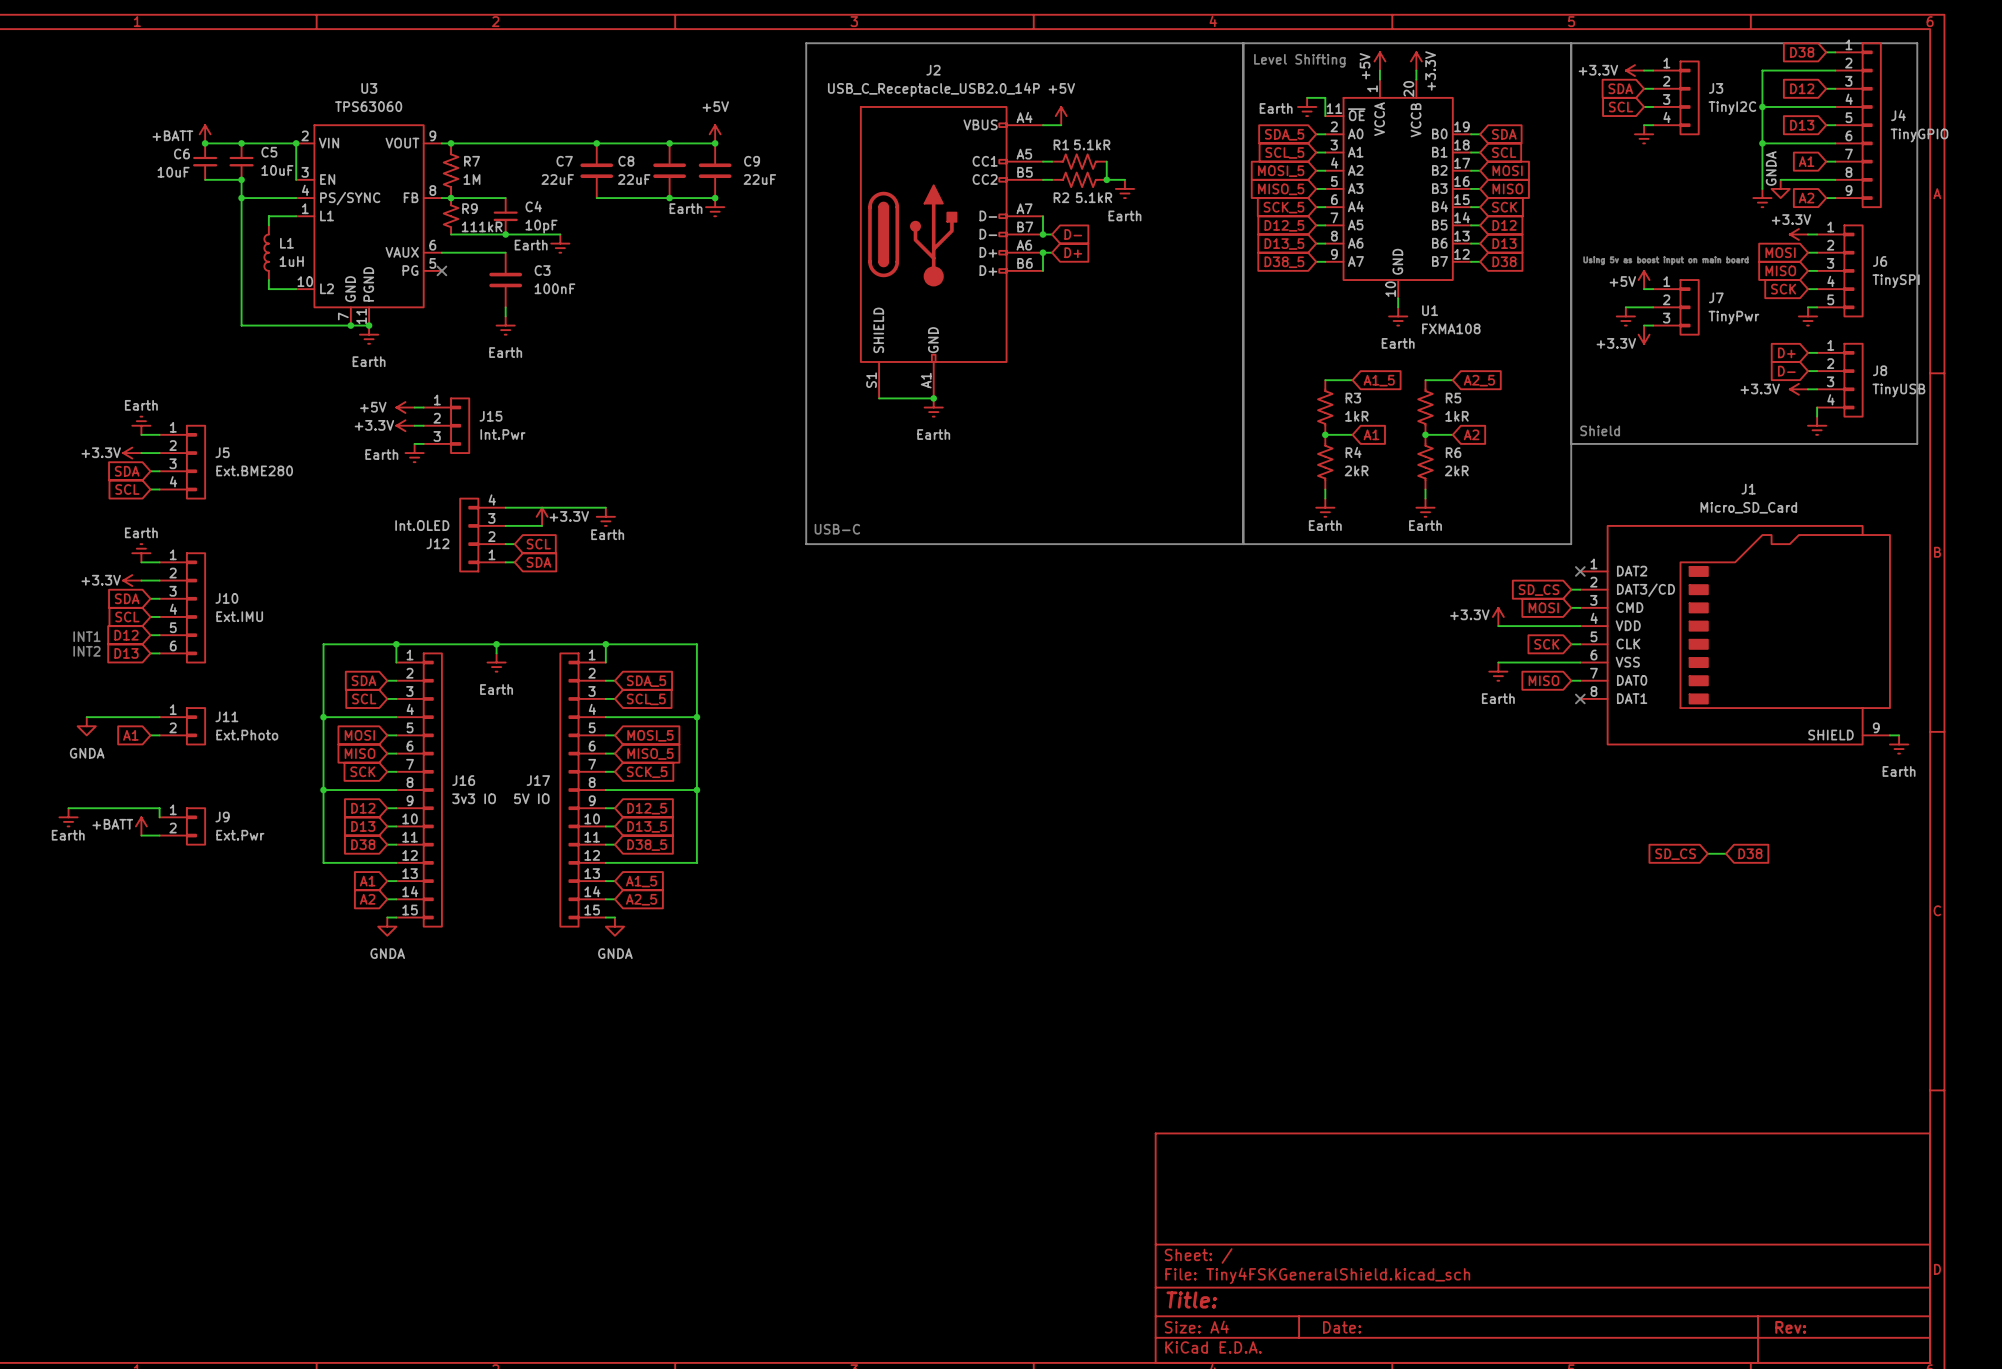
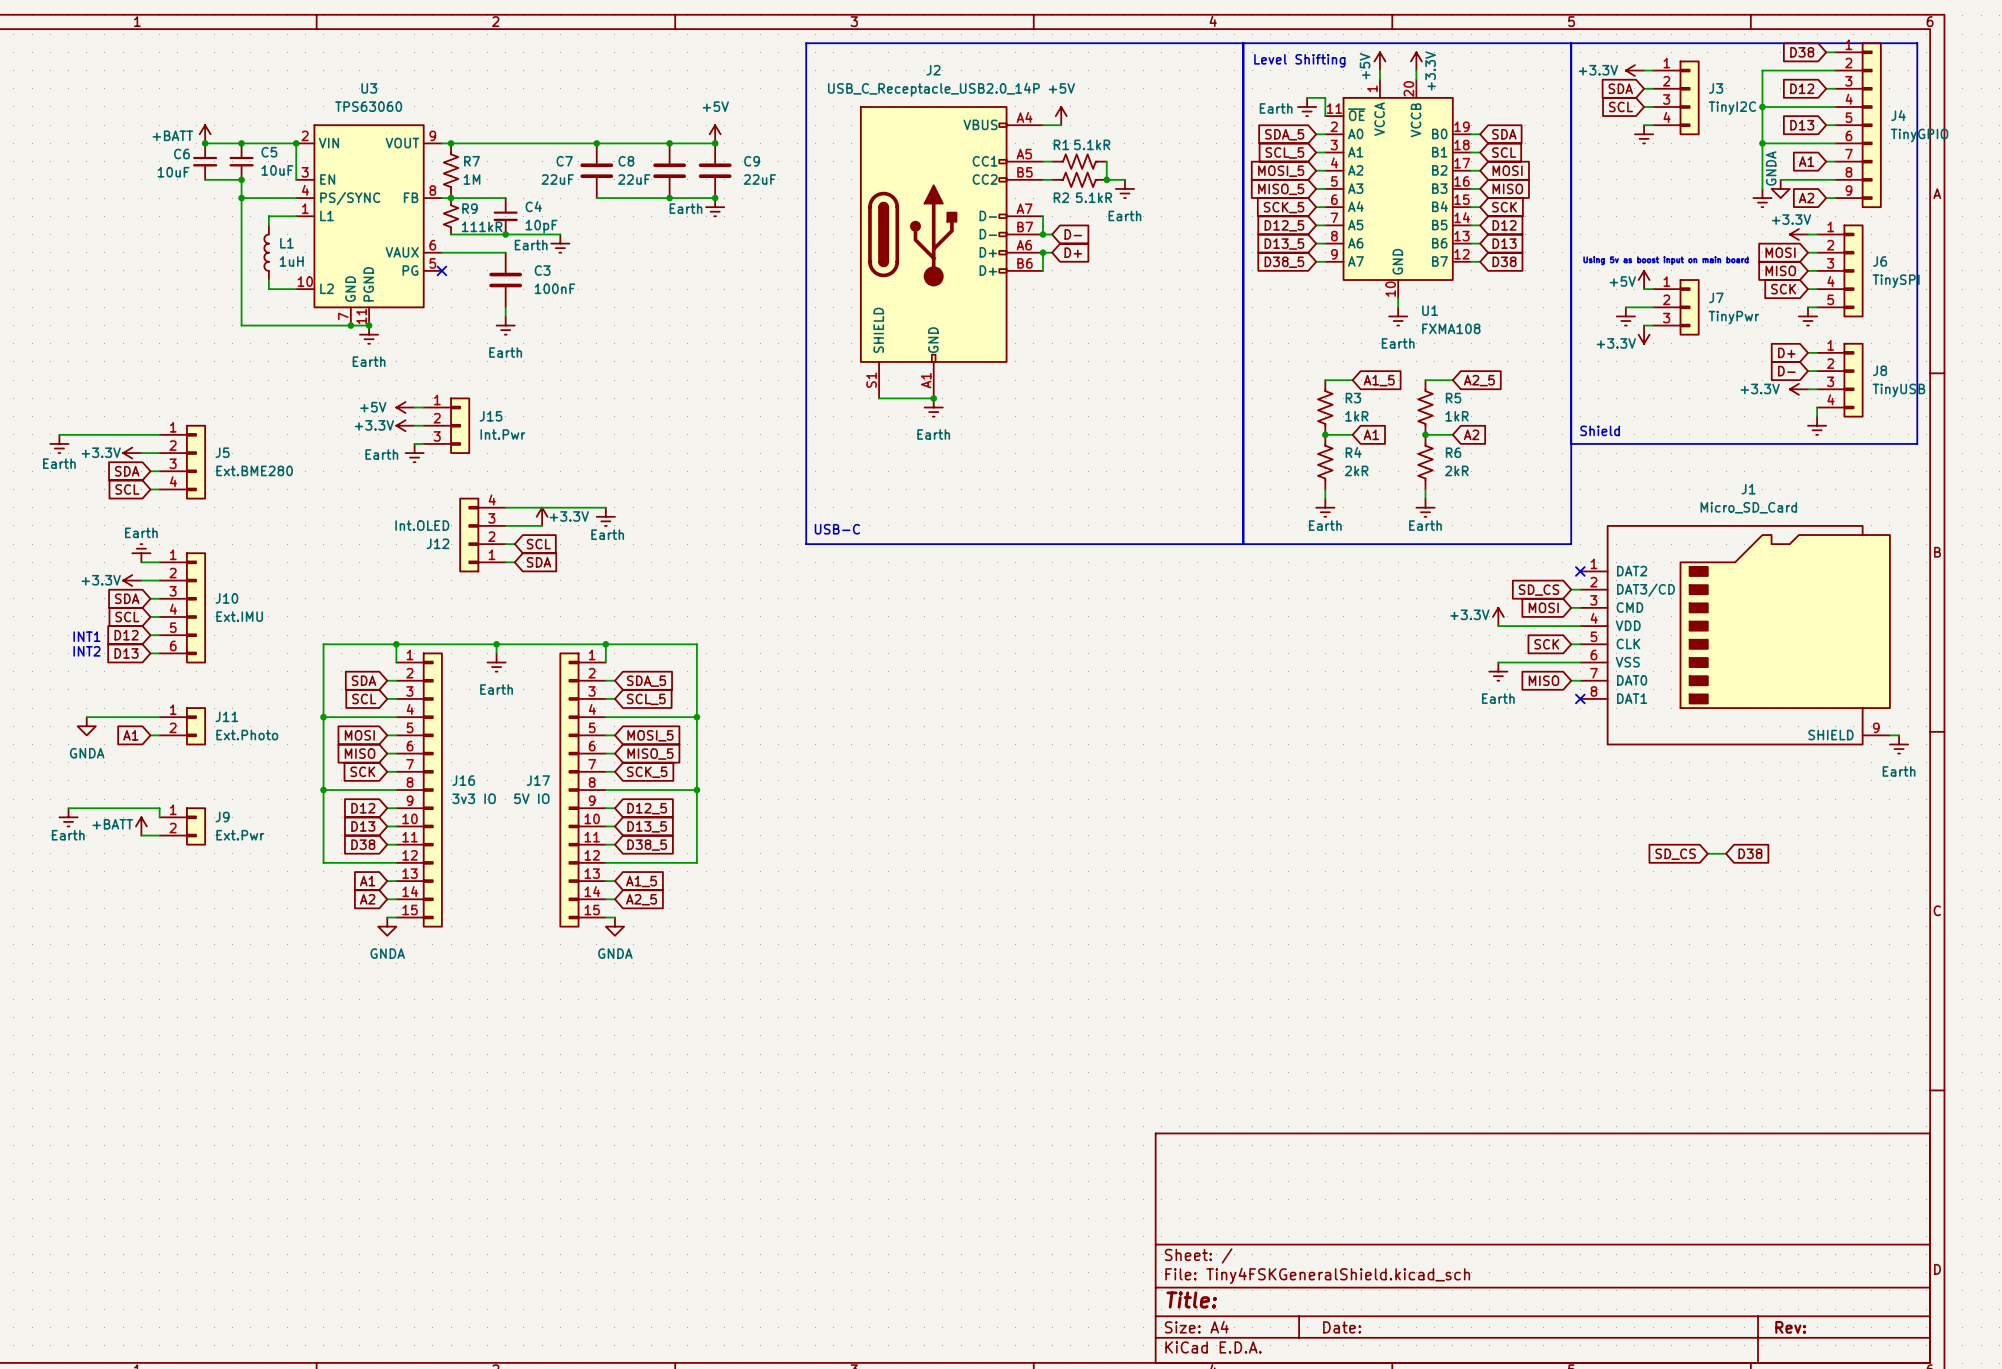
power symbol rotation: 0° (141, 425) -> 180° (59, 443)
power symbol position: Earth (141, 425) -> Earth (59, 443)
wire: none -> (59, 434) (141, 434)

